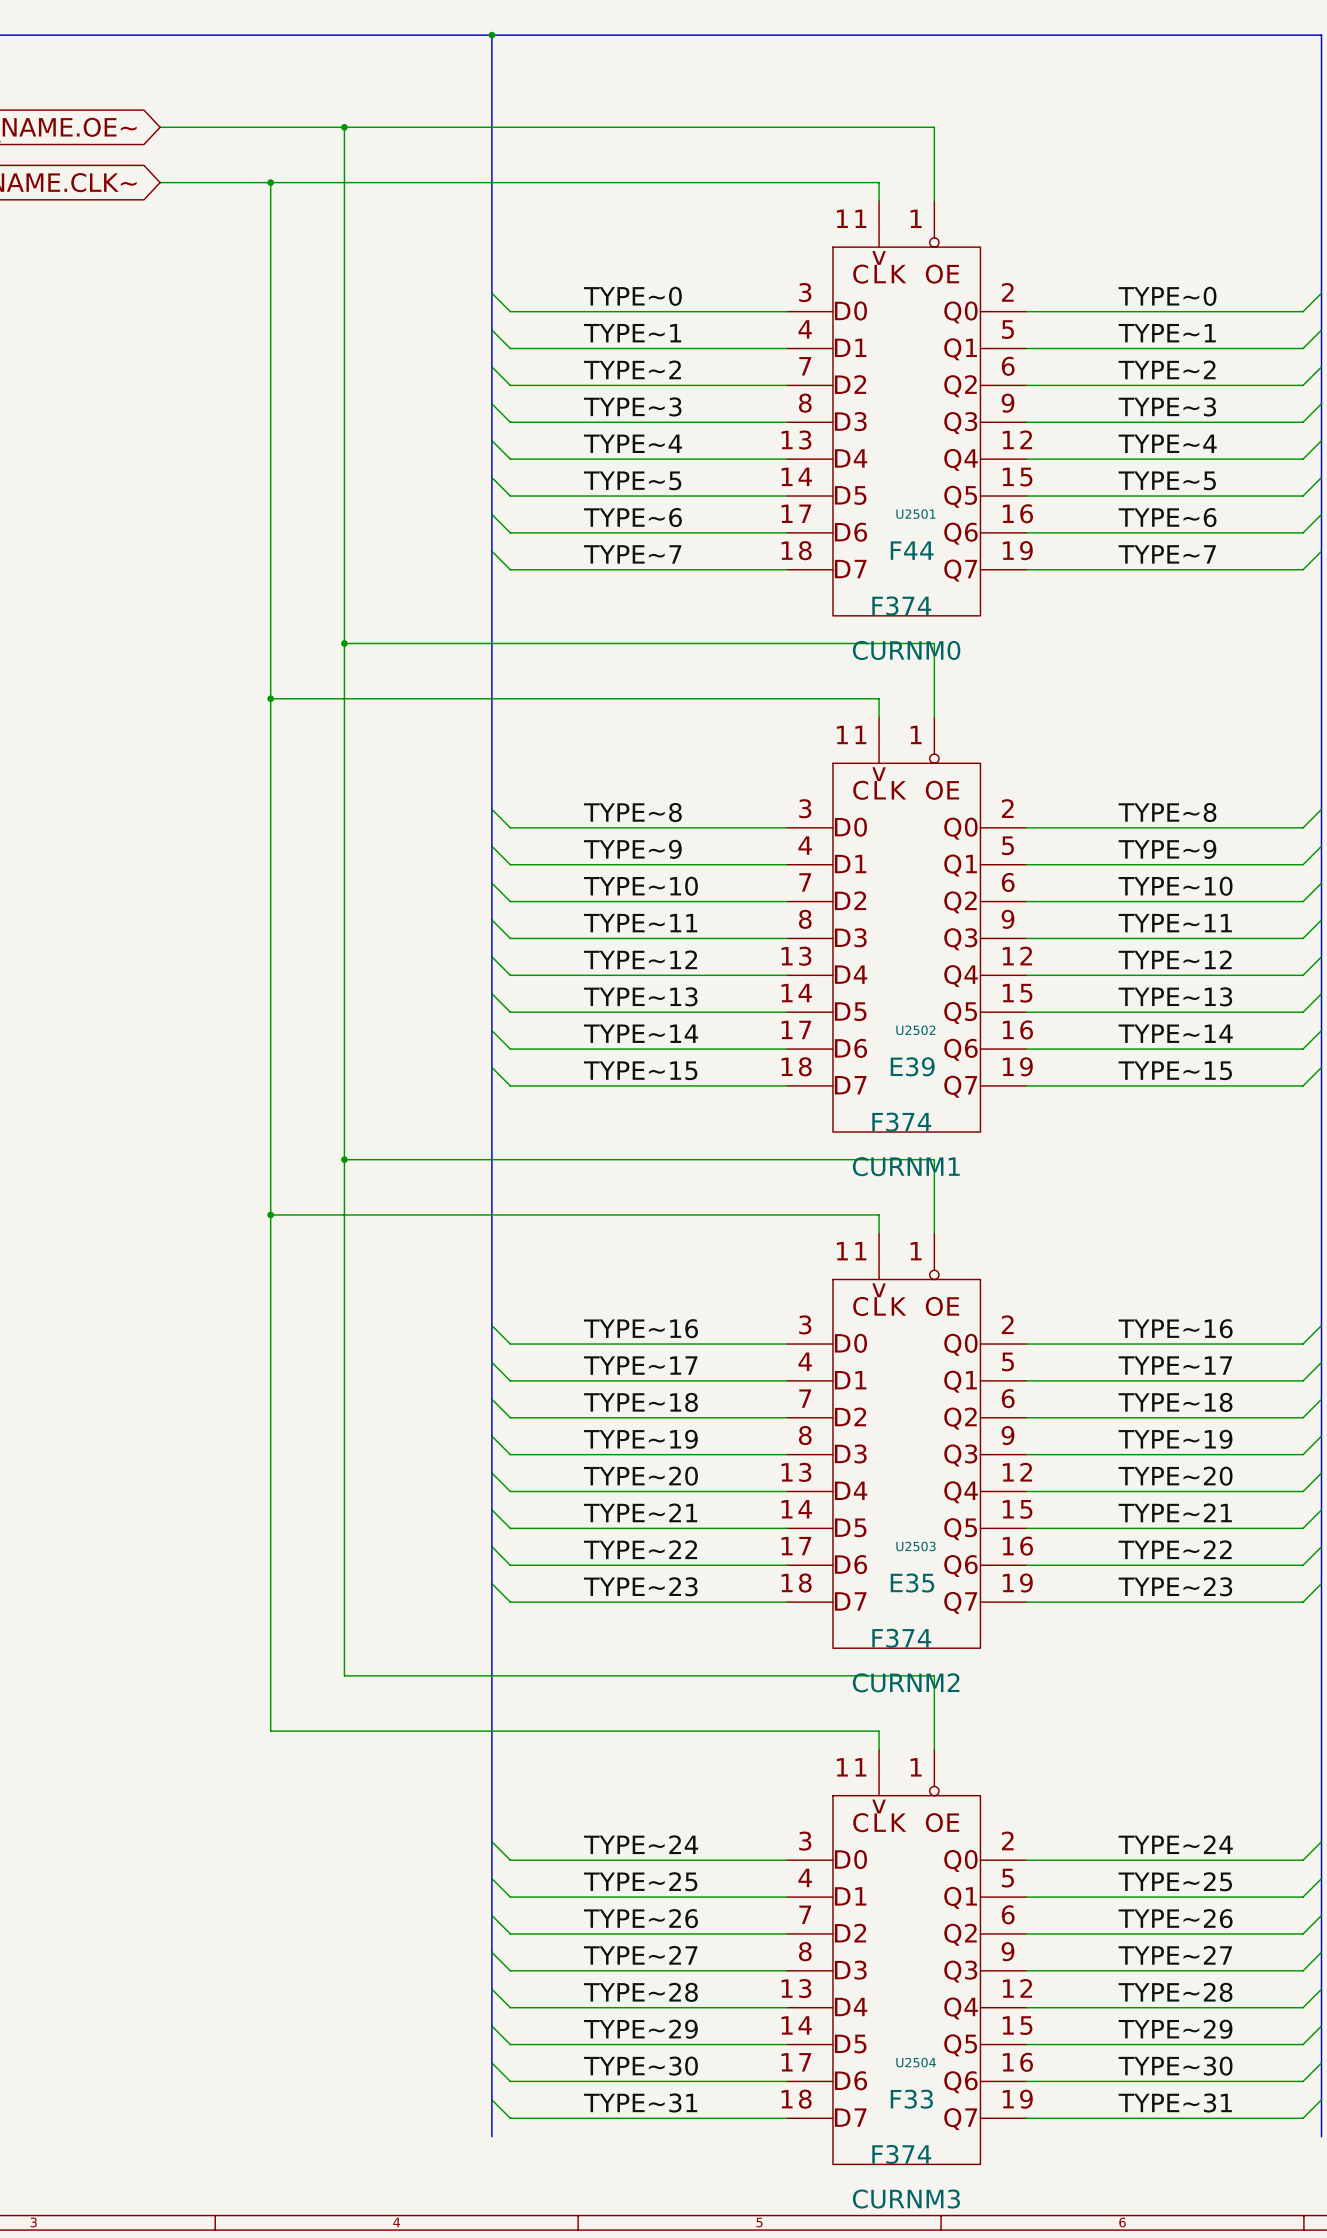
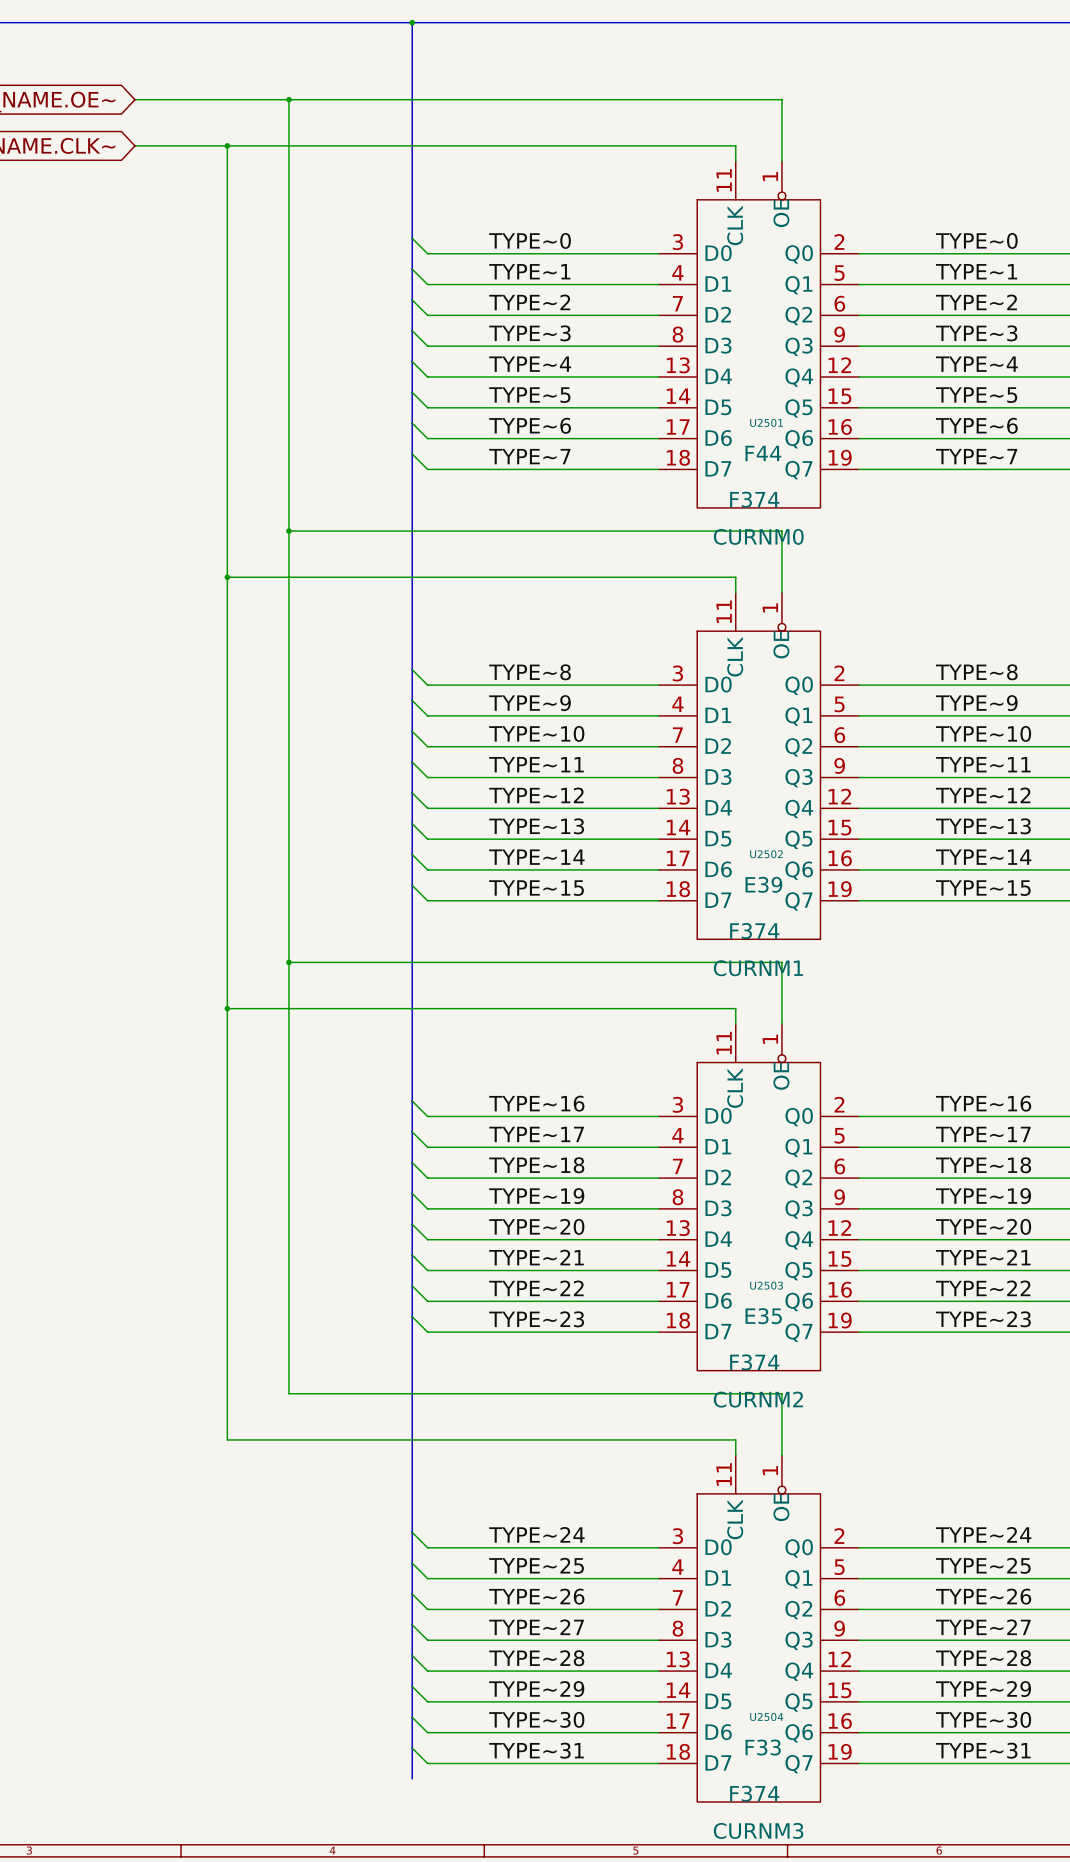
U2501 symbol: [786, 201, 1027, 616] -> [658, 161, 859, 508]
U2502 symbol: [786, 717, 1027, 1133] -> [658, 592, 859, 940]
U2503 symbol: [786, 1233, 1027, 1649] -> [658, 1024, 859, 1371]
U2504 symbol: [786, 1749, 1027, 2165] -> [658, 1455, 859, 1803]

